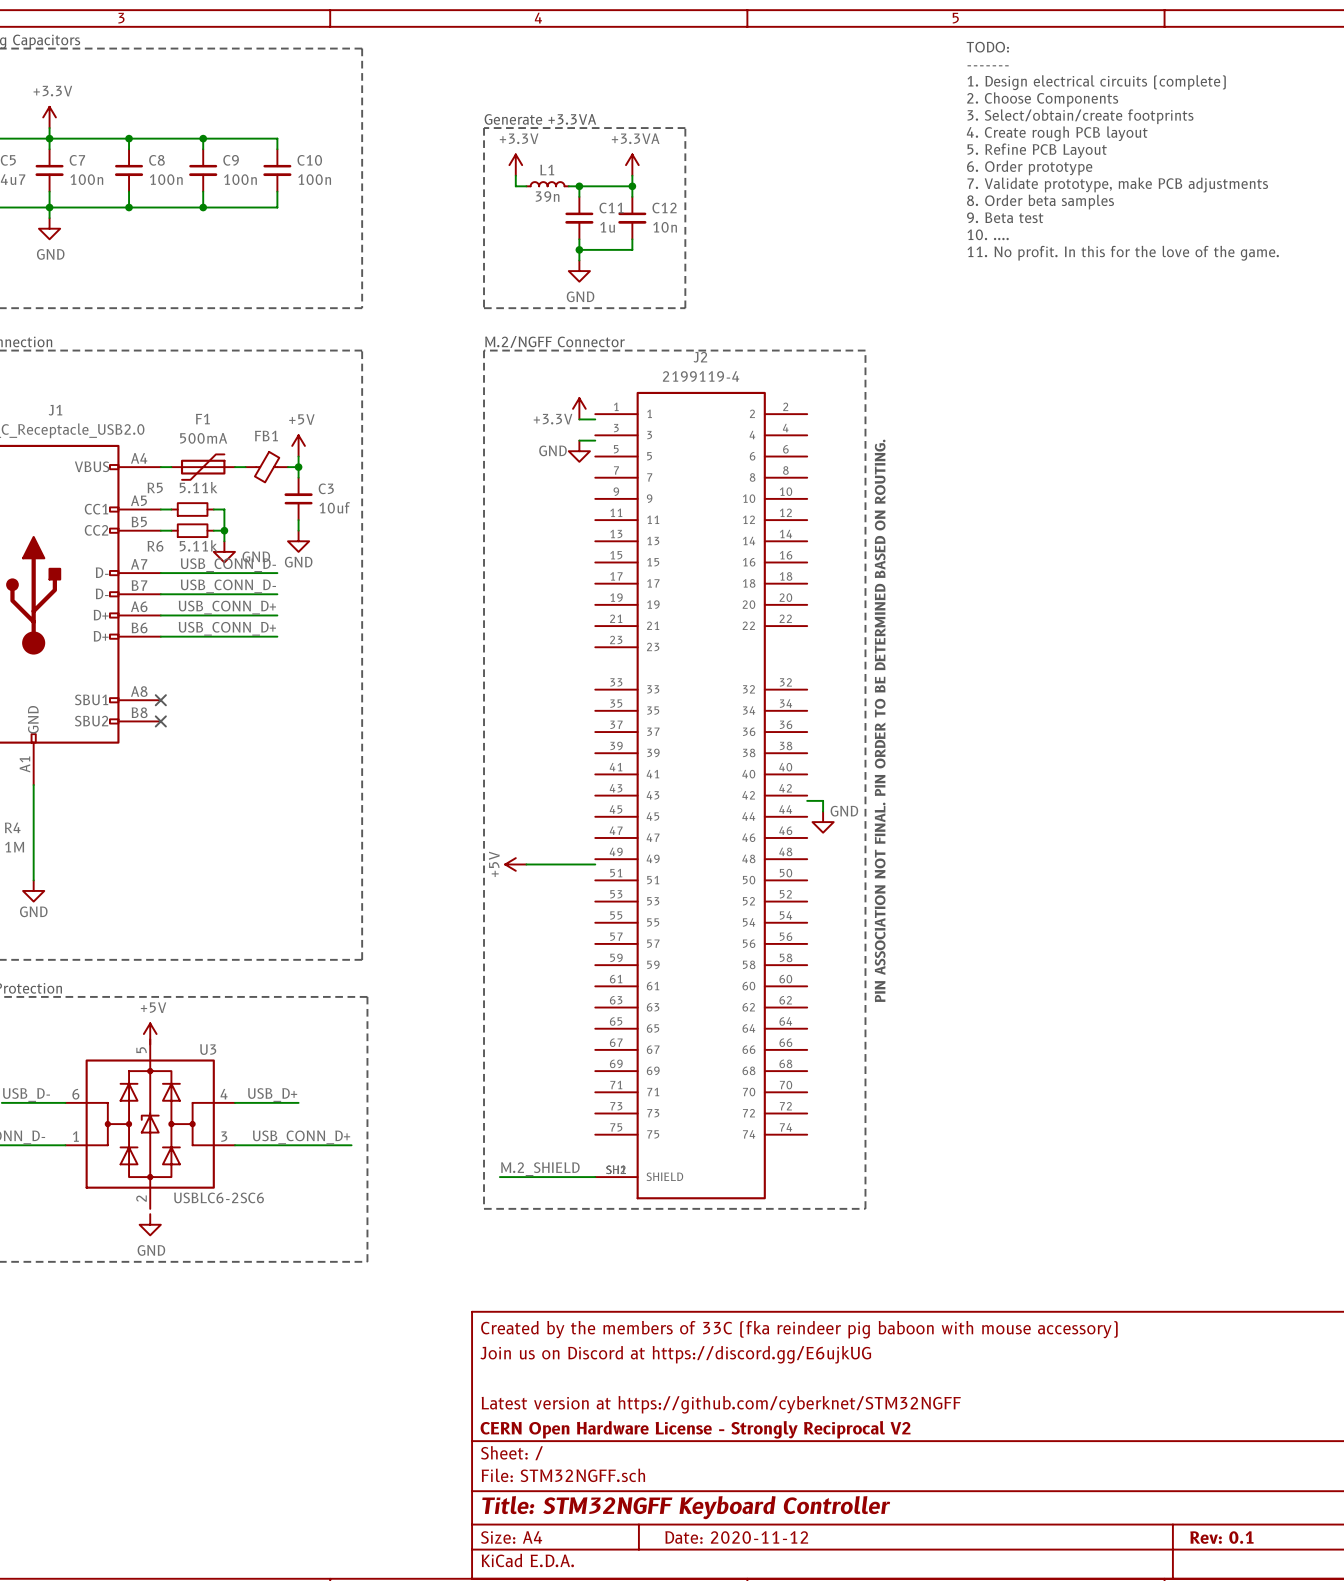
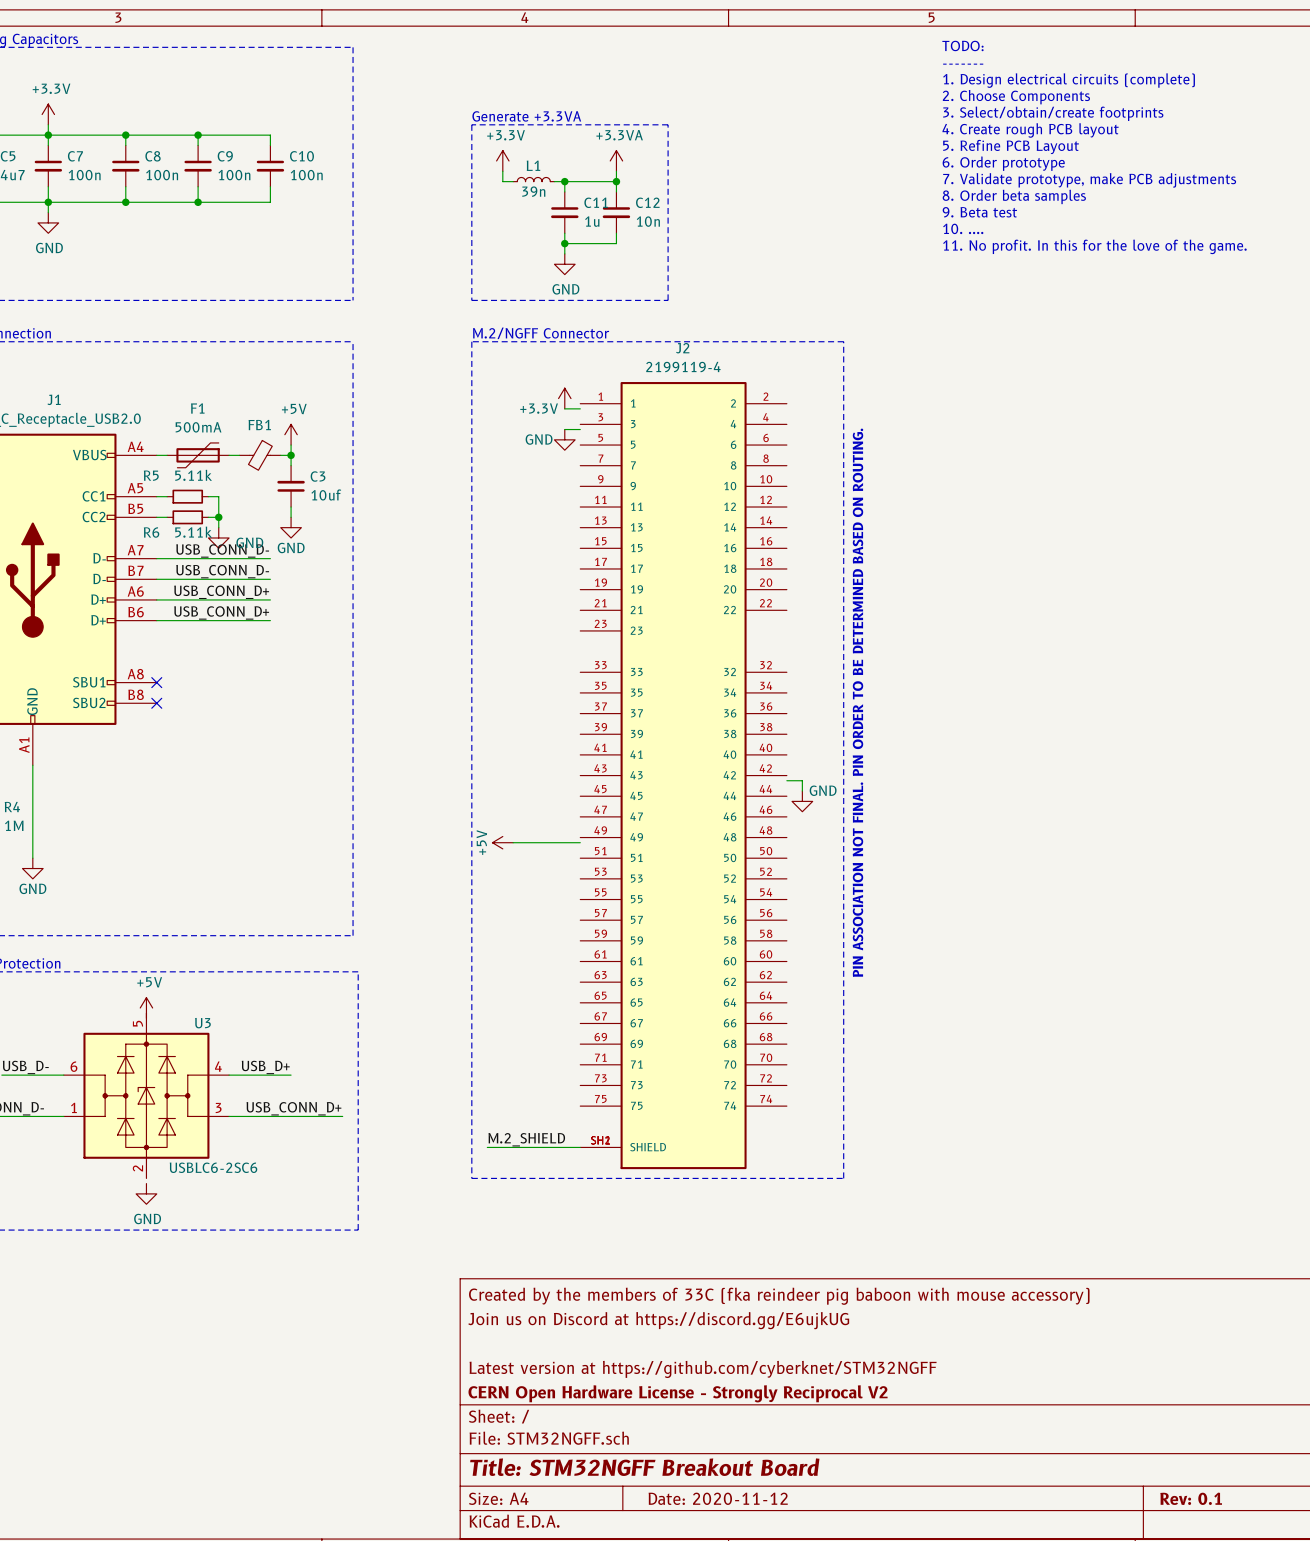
title block: Title: STM32NGFF Keyboard Controller (686, 1507) -> Title: STM32NGFF Breakout Board (644, 1467)

